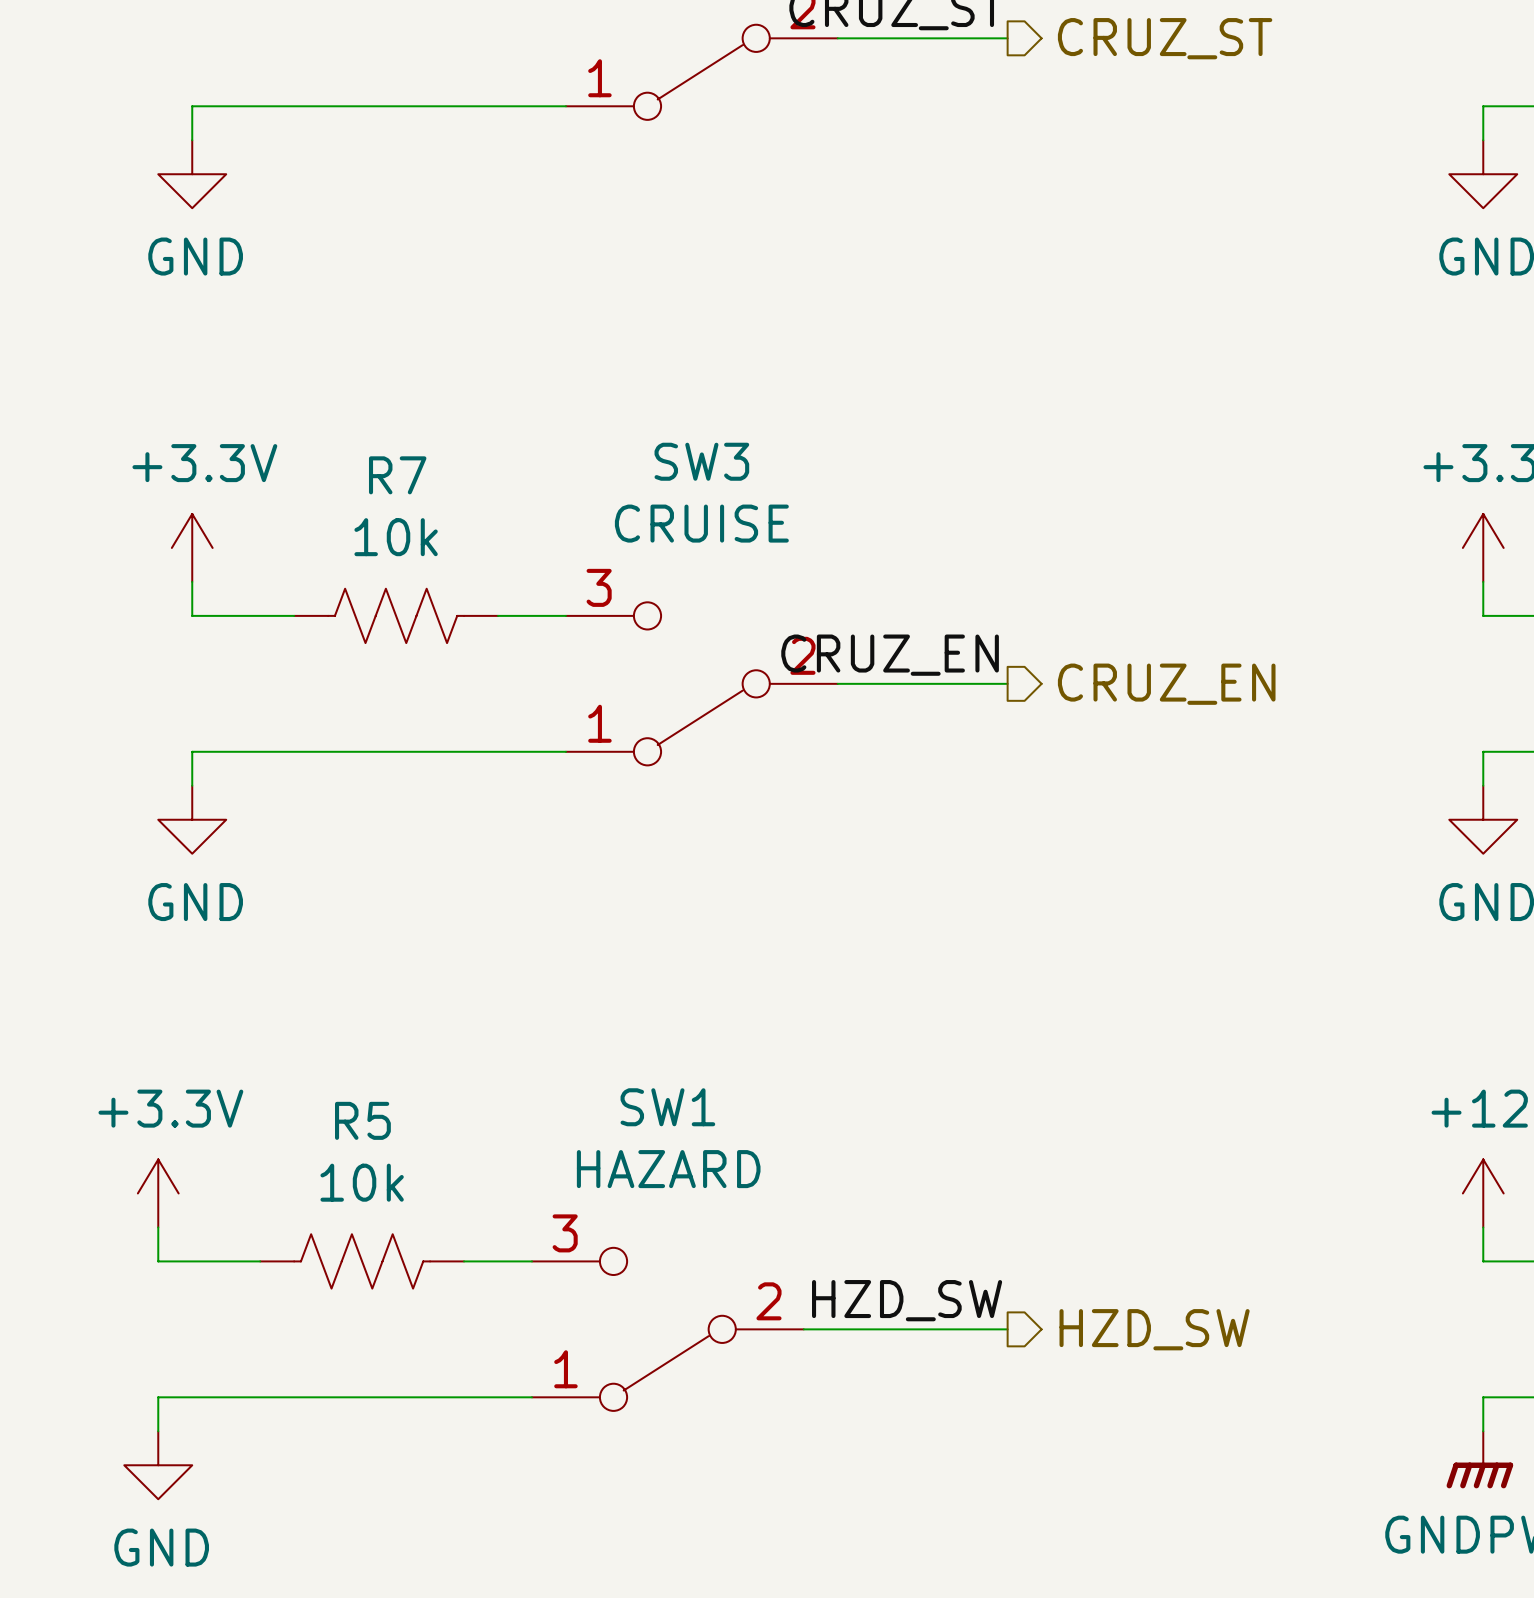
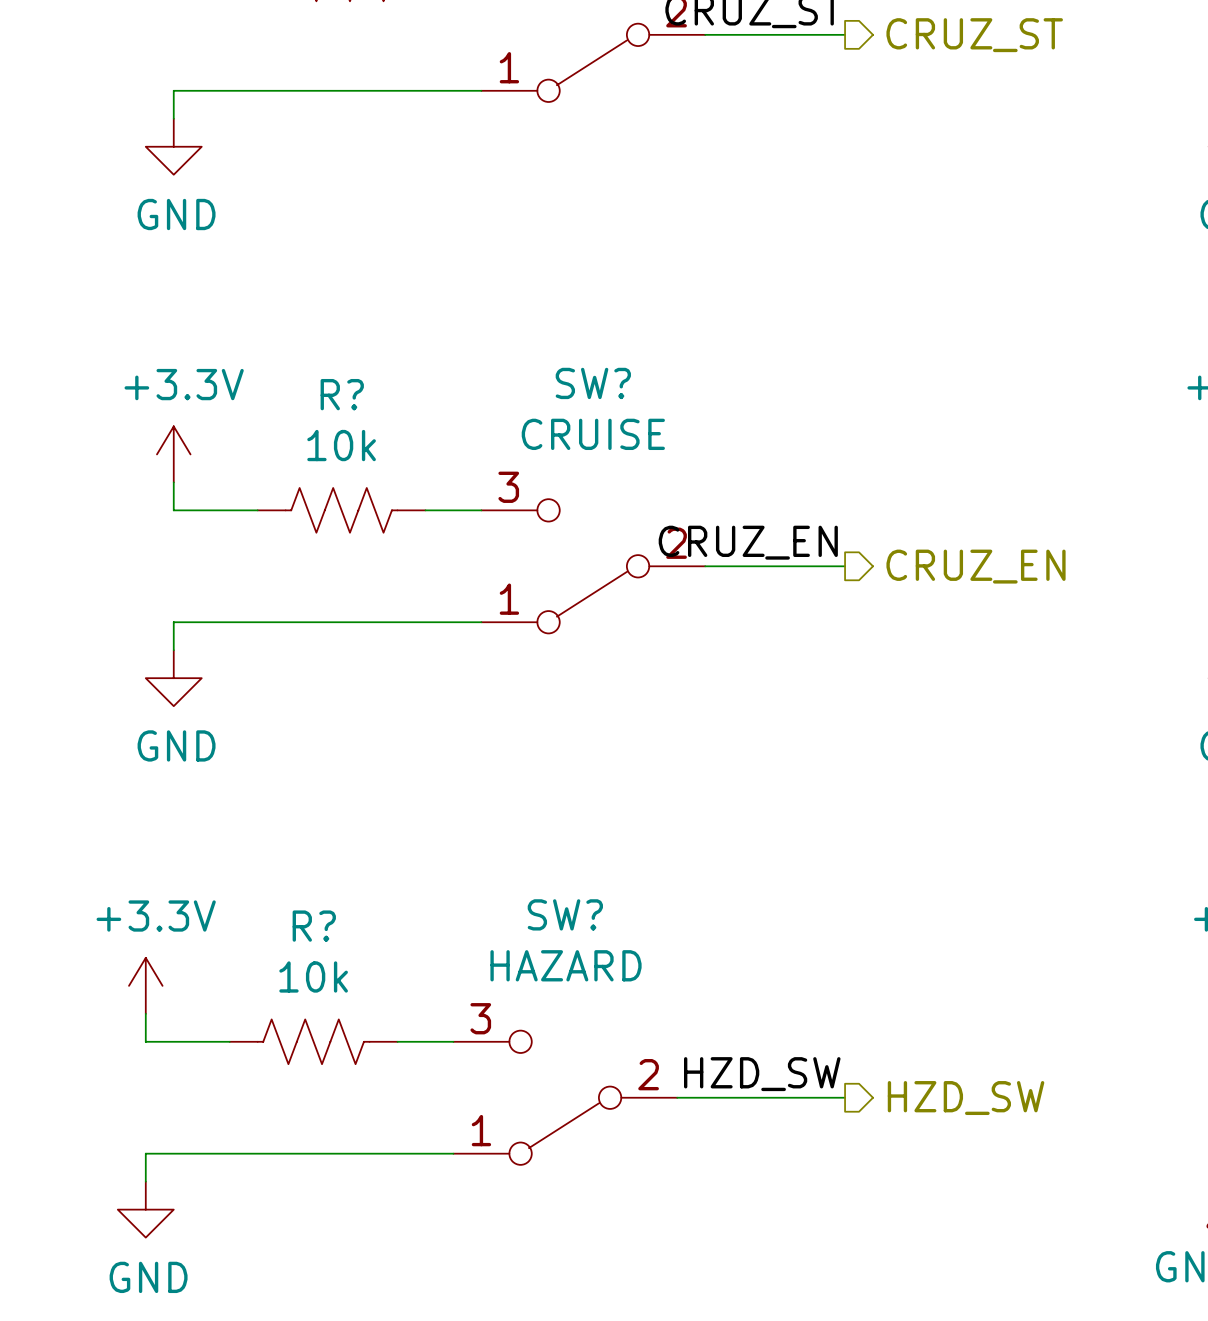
SW3 name: SW3 (701, 461) -> SW? (593, 383)
R7 name: R7 (397, 475) -> R? (342, 394)
SW1 name: SW1 (667, 1107) -> SW? (565, 914)
R5 name: R5 (362, 1120) -> R? (314, 926)

